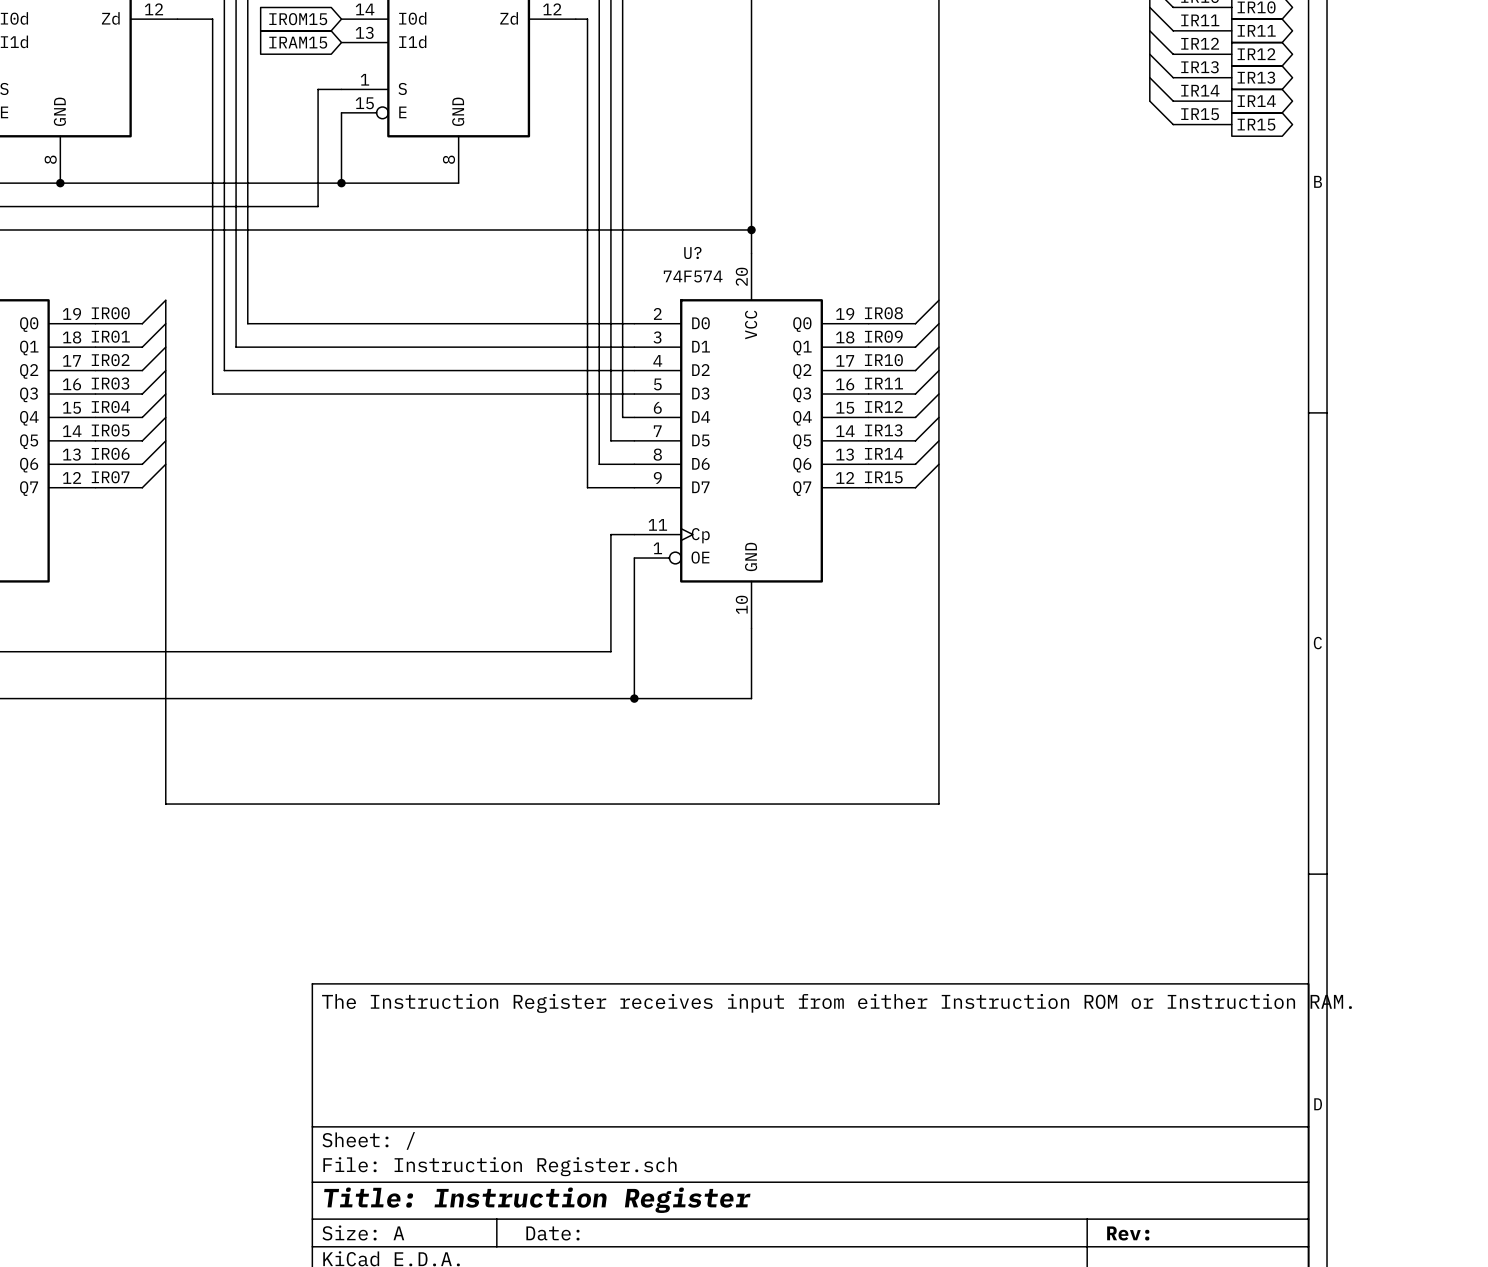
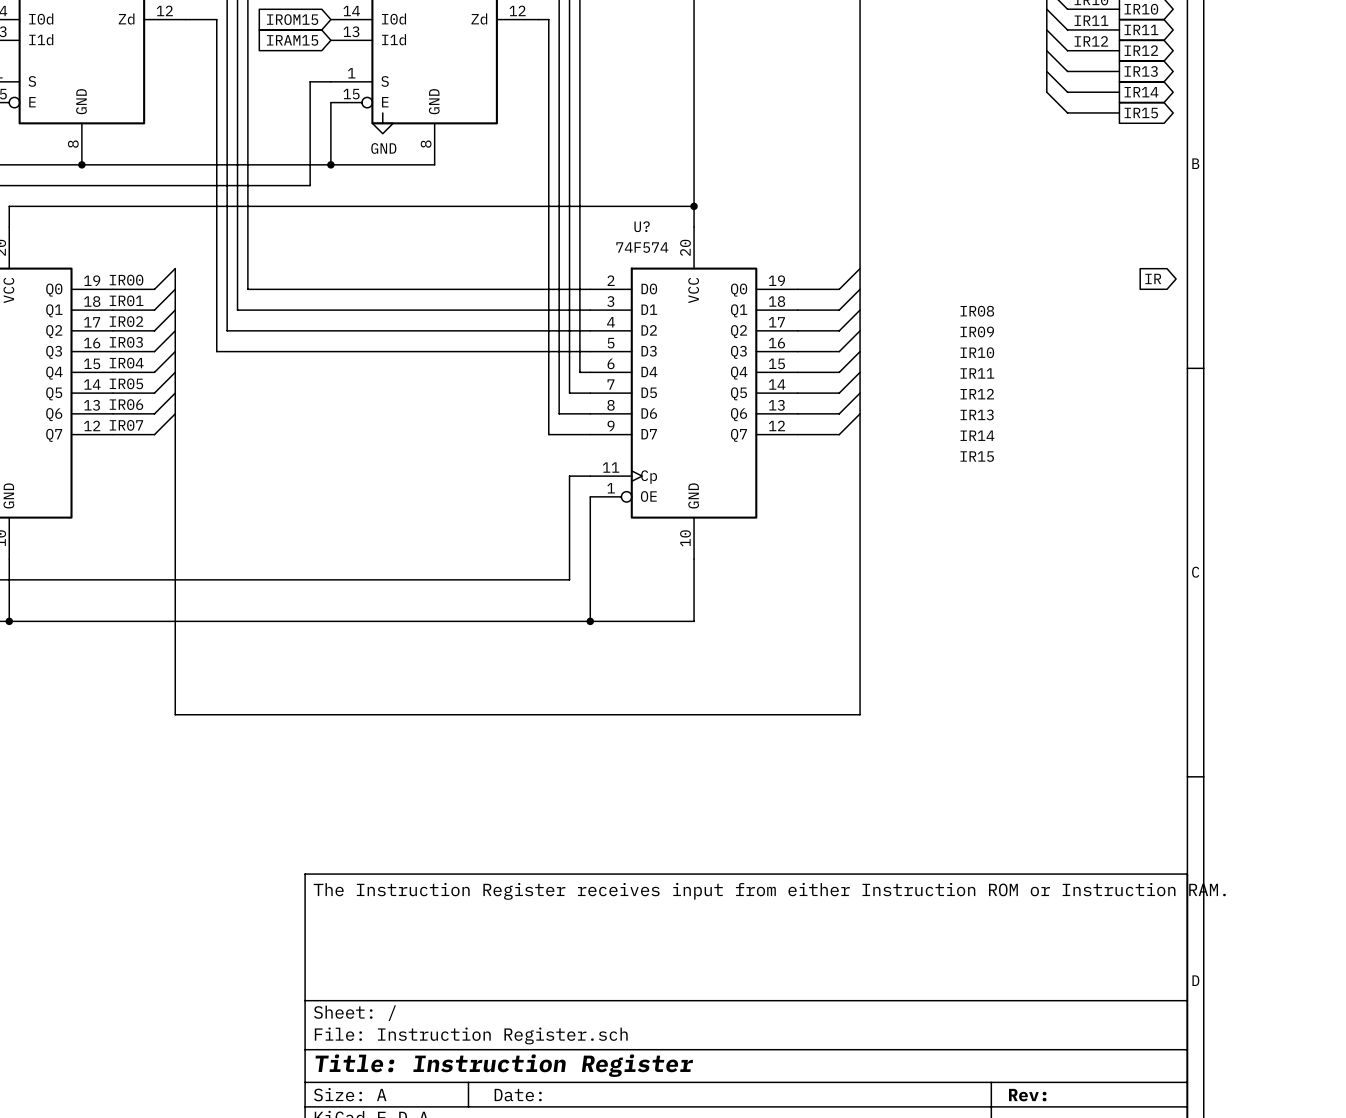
label: IR13 (1199, 67) -> none
label: IR14 (1200, 90) -> none
label: IR15 (1200, 114) -> none
power symbol: none -> GND (382, 123)
global label: none -> IR (1153, 278)
label position: IR08 (883, 313) -> IR08 (977, 311)
label position: IR09 (883, 336) -> IR09 (977, 331)
label position: IR10 (883, 360) -> IR10 (977, 352)
label position: IR11 (883, 383) -> IR11 (977, 373)
label position: IR12 (883, 406) -> IR12 (977, 394)
label position: IR13 (883, 430) -> IR13 (977, 414)
label position: IR14 (884, 453) -> IR14 (977, 435)
label position: IR15 (883, 477) -> IR15 (977, 456)

